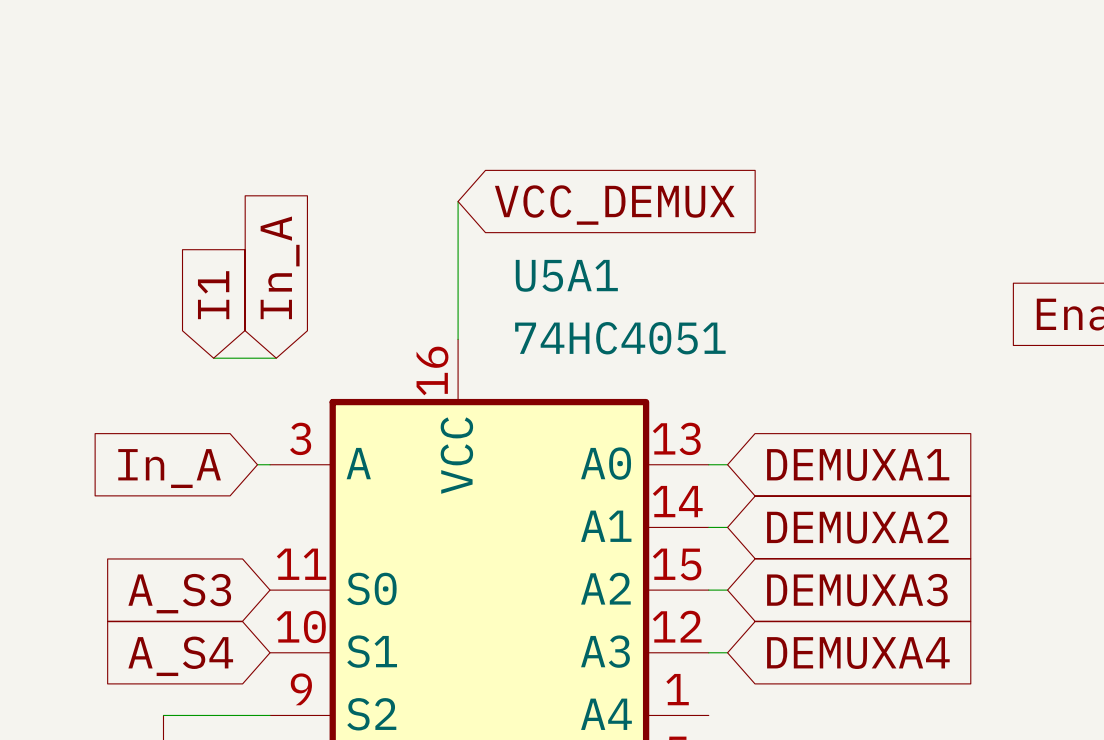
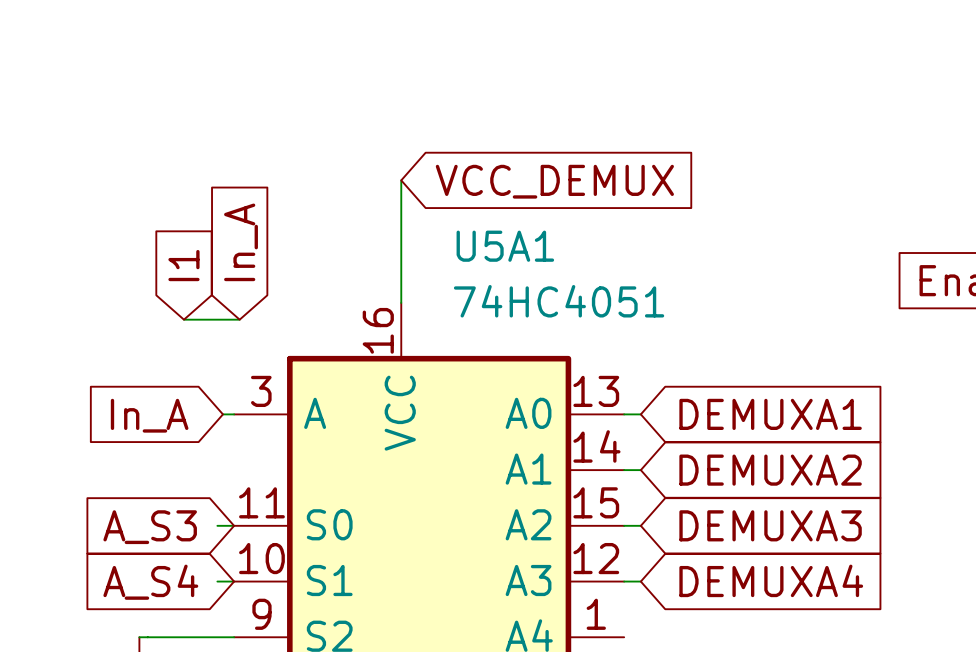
wire: none -> (217, 525) (234, 525)
wire: none -> (217, 581) (234, 581)

